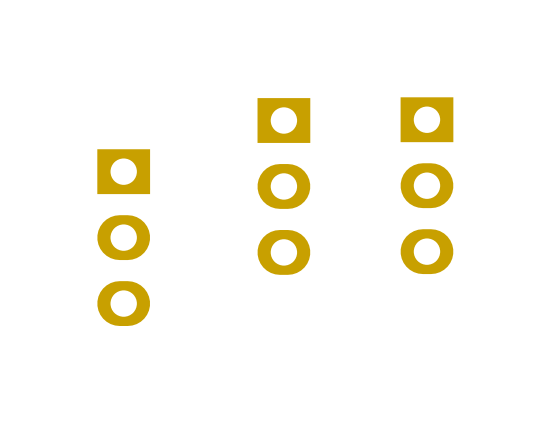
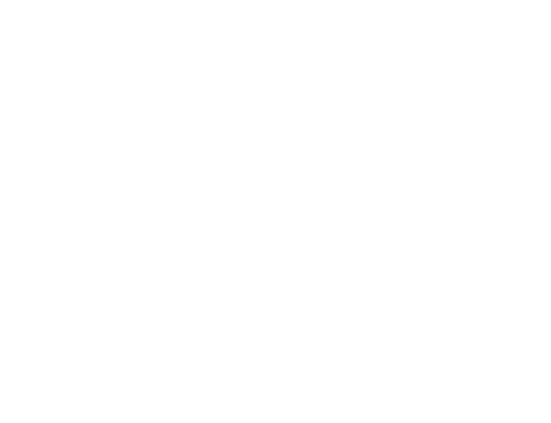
part: (426, 185) -> none
part: (283, 186) -> none
part: (123, 237) -> none

